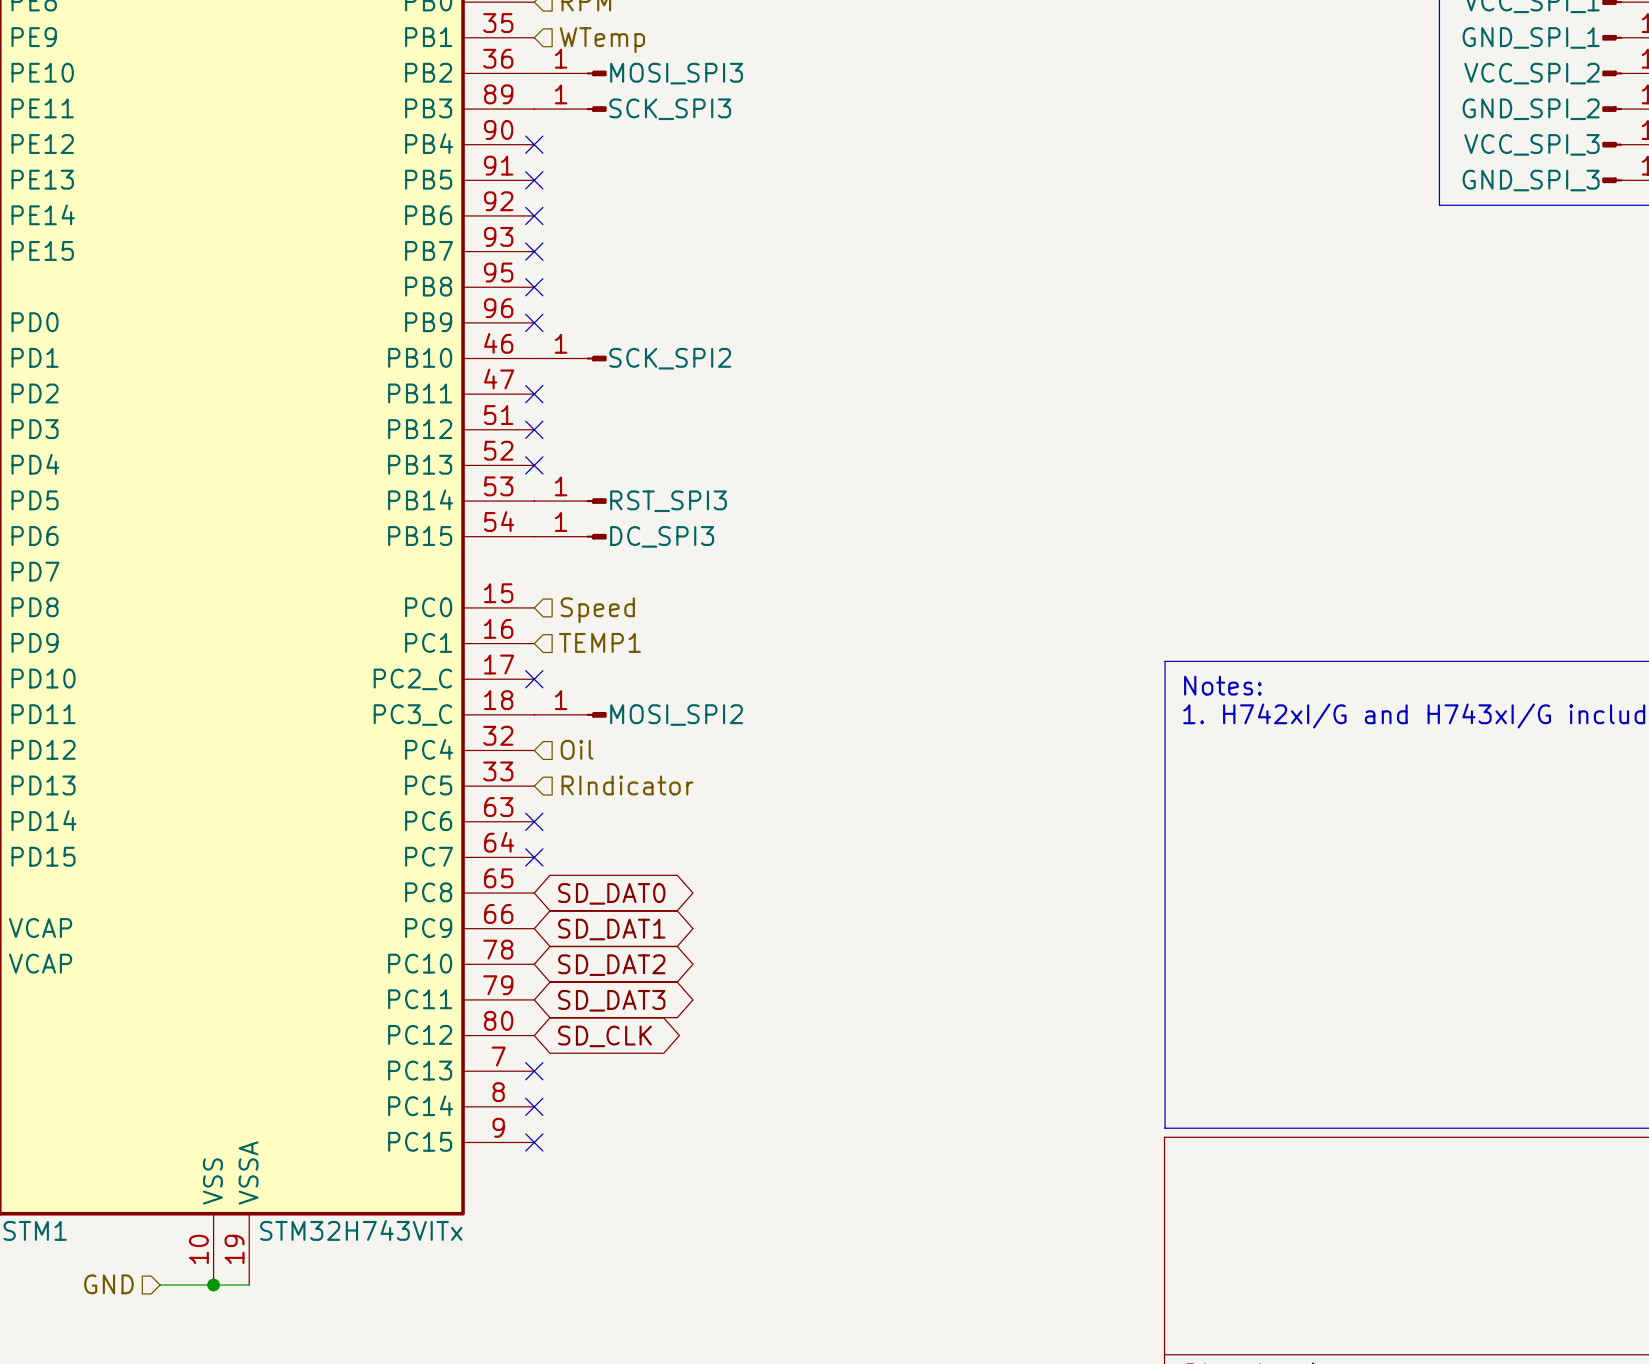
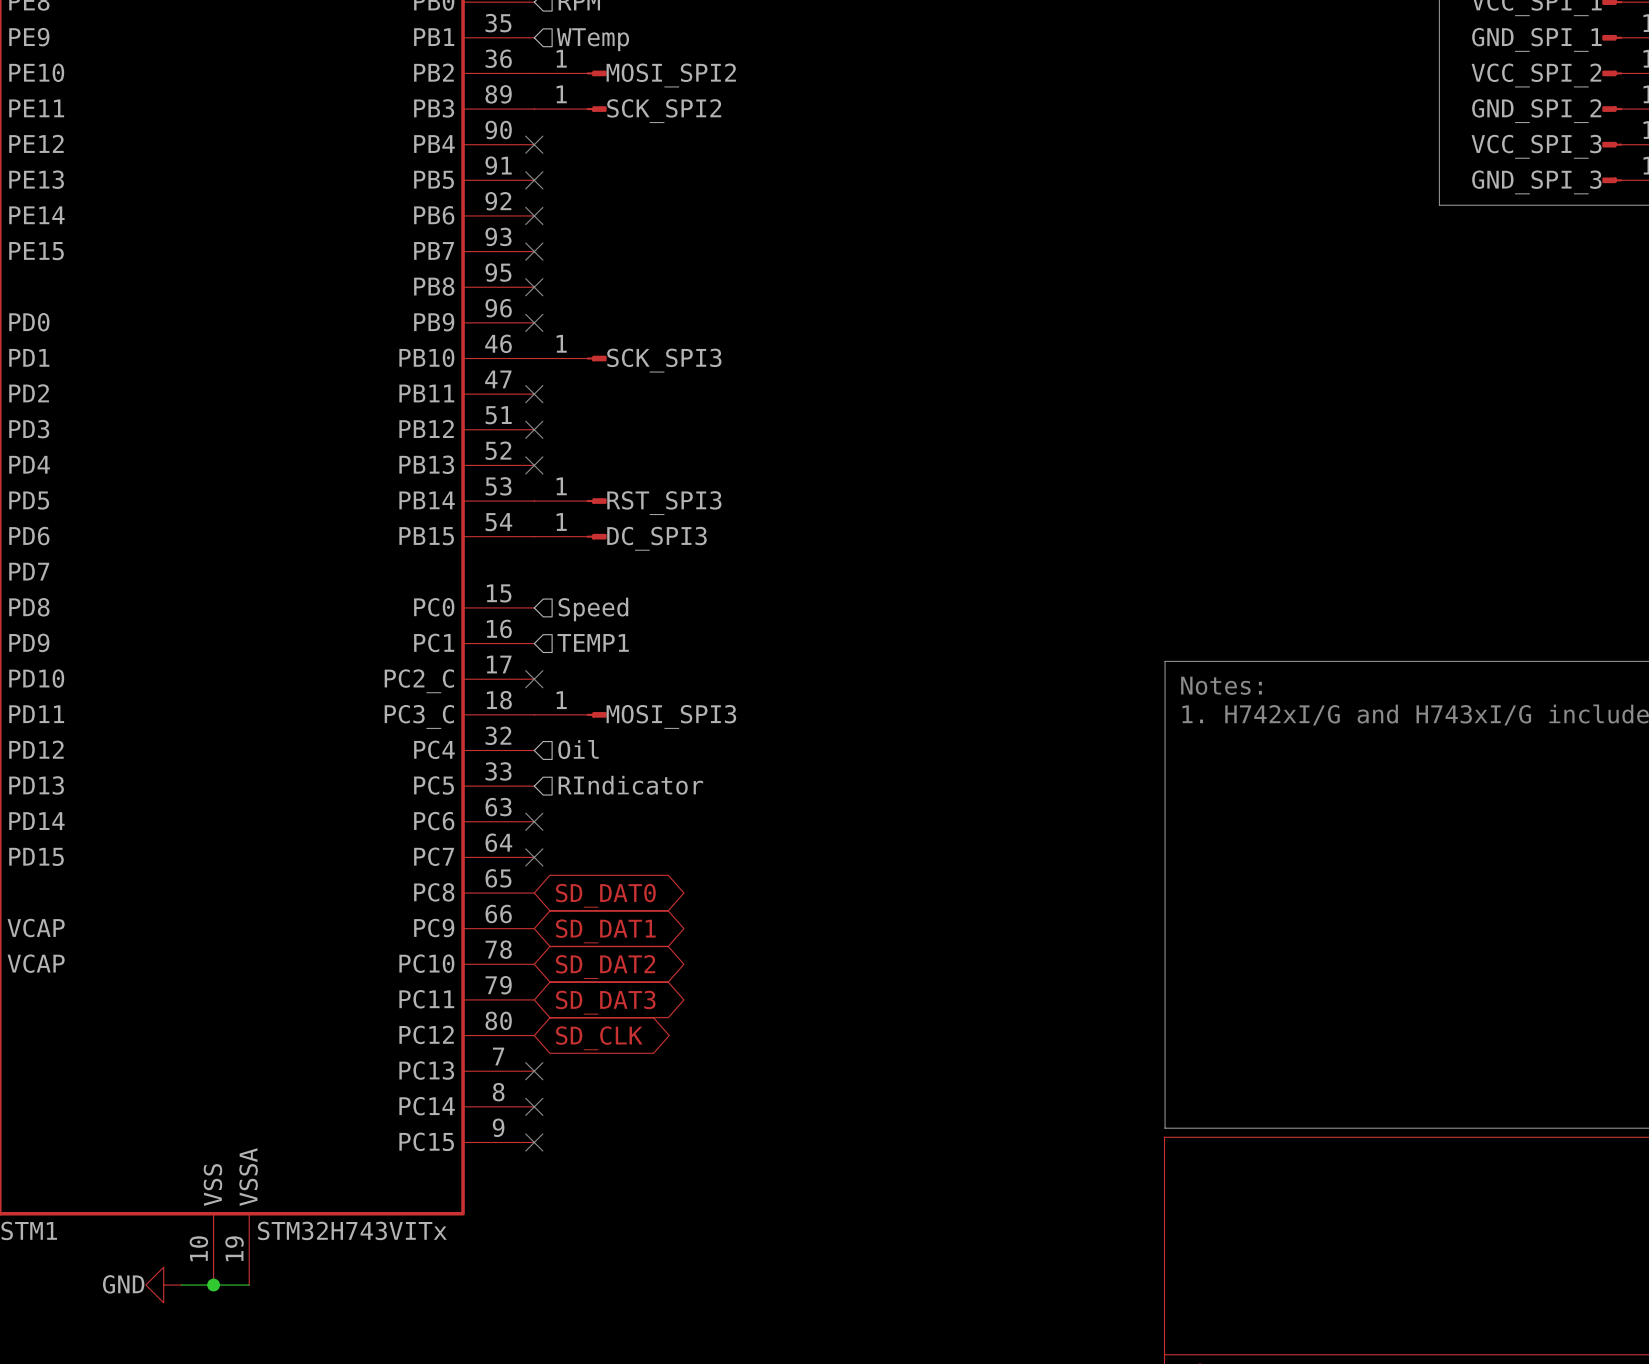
MOSI_SPI3 name: MOSI_SPI3 (676, 73) -> MOSI_SPI2 (671, 75)
SCK_SPI3 name: SCK_SPI3 (670, 109) -> SCK_SPI2 (664, 111)
SCK_SPI2 name: SCK_SPI2 (670, 358) -> SCK_SPI3 (664, 360)
MOSI_SPI2 name: MOSI_SPI2 (676, 715) -> MOSI_SPI3 (671, 716)
hierarchical label: GND (108, 1284) -> none
power symbol: none -> GND (163, 1285)

